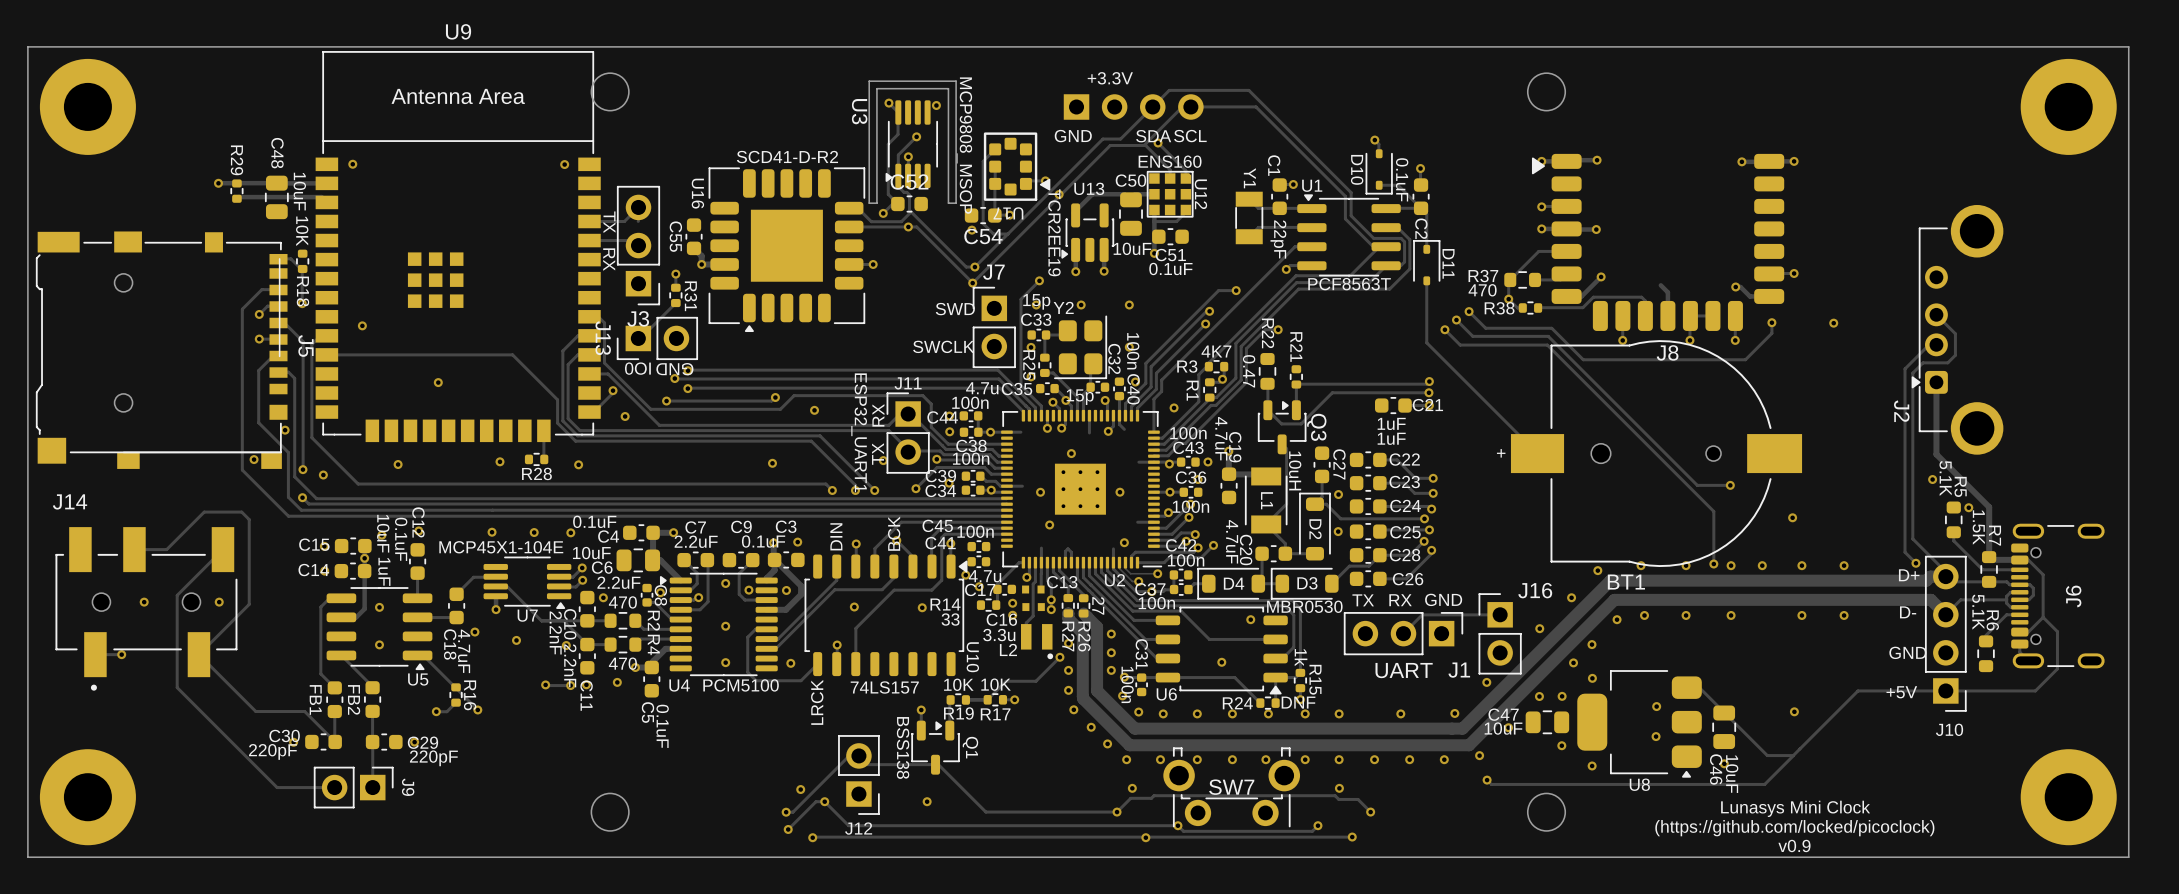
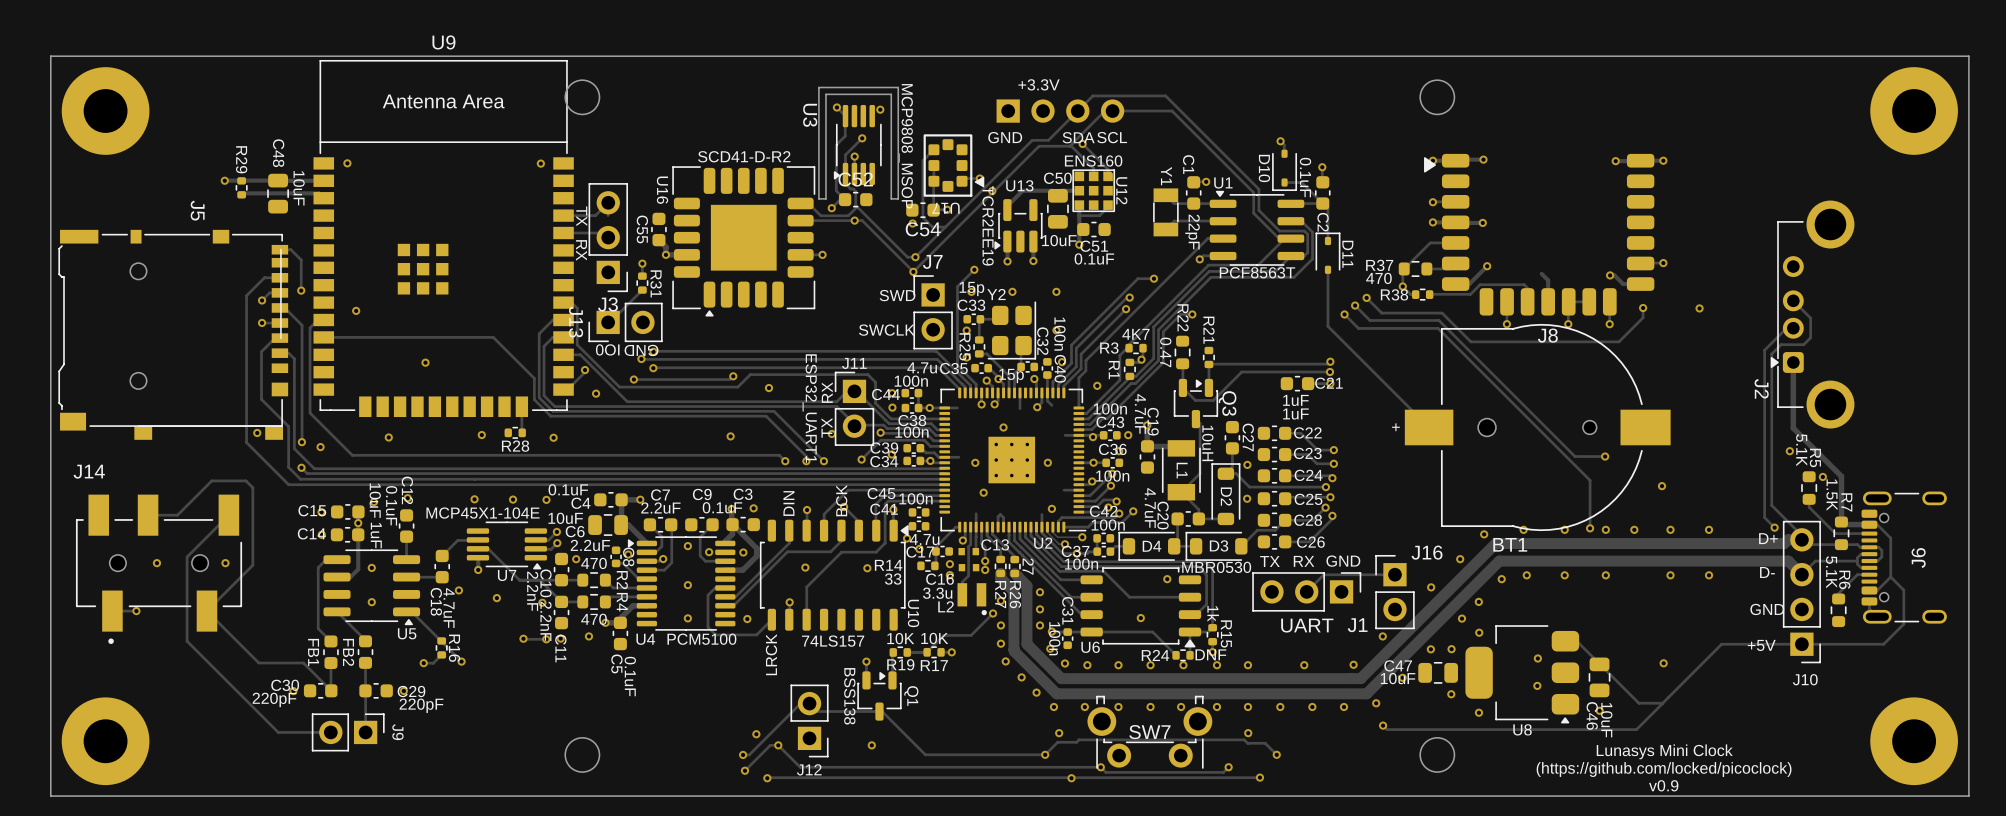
J5 footprint: [35, 231, 288, 469] -> [58, 229, 289, 440]
R18: 10K (302, 261) -> none
J5 name position: J5 (305, 345) -> J5 (197, 210)
via: (285, 430) -> none

